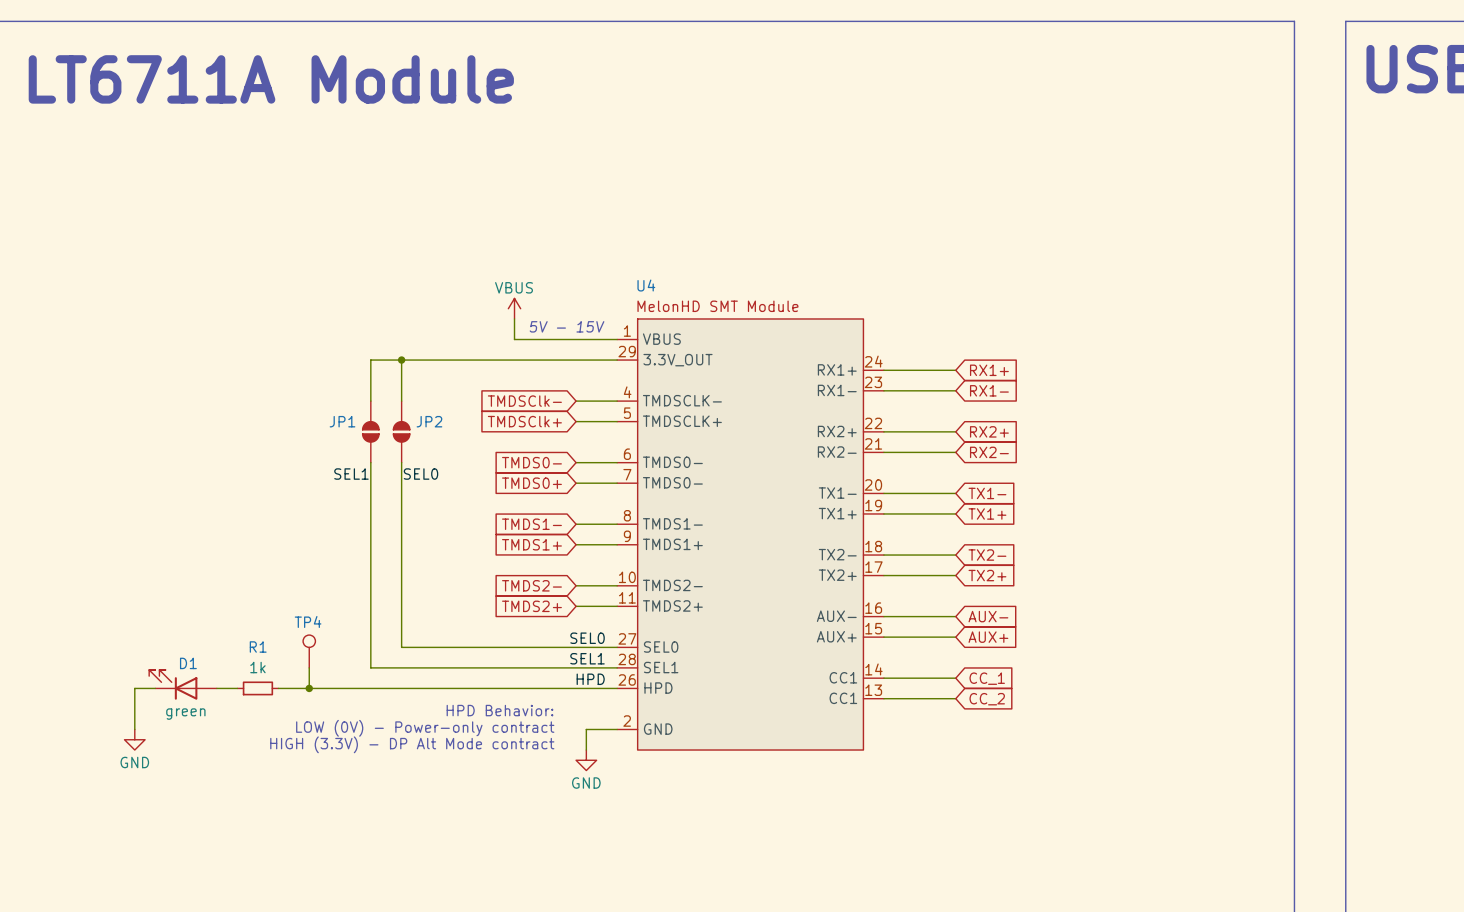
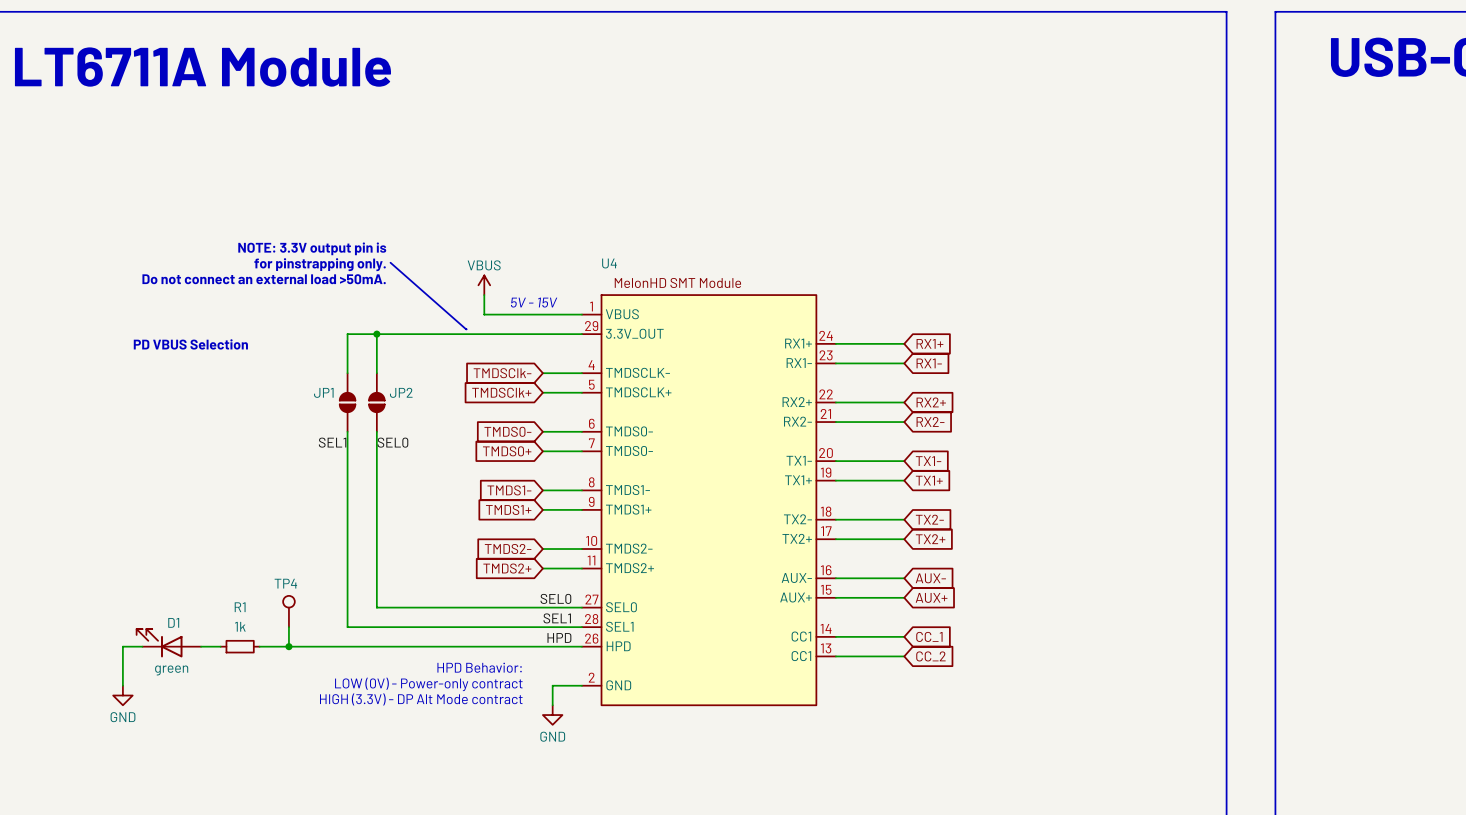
text: none -> NOTE: 3.3V output pin is (312, 248)
line: none -> (390, 262) (466, 329)
text: none -> for pinstrapping only. (320, 264)
text: none -> Do not connect an external load >50mA. (264, 279)
text: none -> PD VBUS Selection (190, 344)

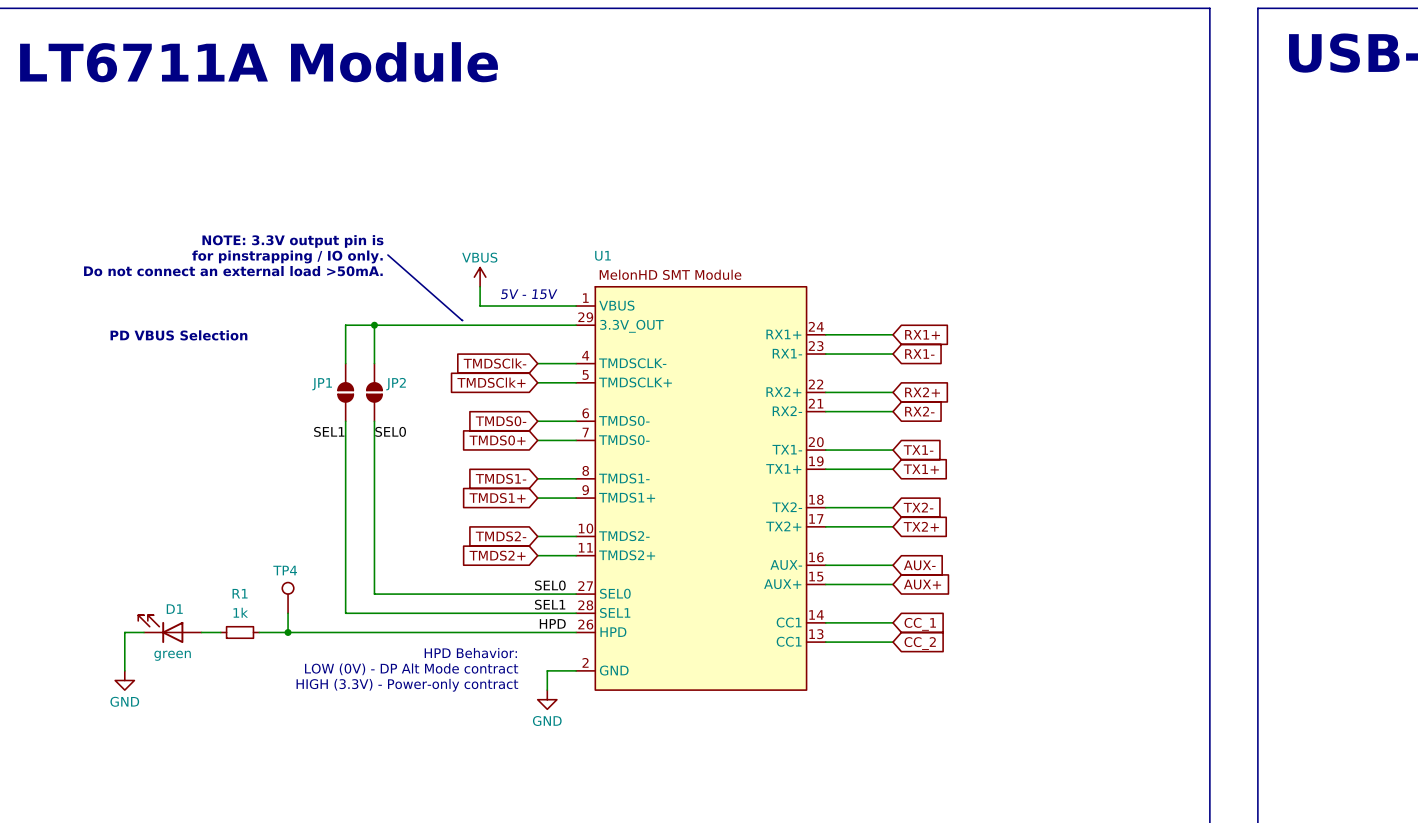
U4 name: U4 (609, 263) -> U1 (602, 255)
text: for pinstrapping only. (320, 264) -> for pinstrapping / IO only. (287, 256)
text: LOW (0V) - Power-only contract (428, 684) -> LOW (0V) - DP Alt Mode contract (411, 669)
text: HIGH (3.3V) - DP Alt Mode contract (421, 699) -> HIGH (3.3V) - Power-only contract (407, 685)

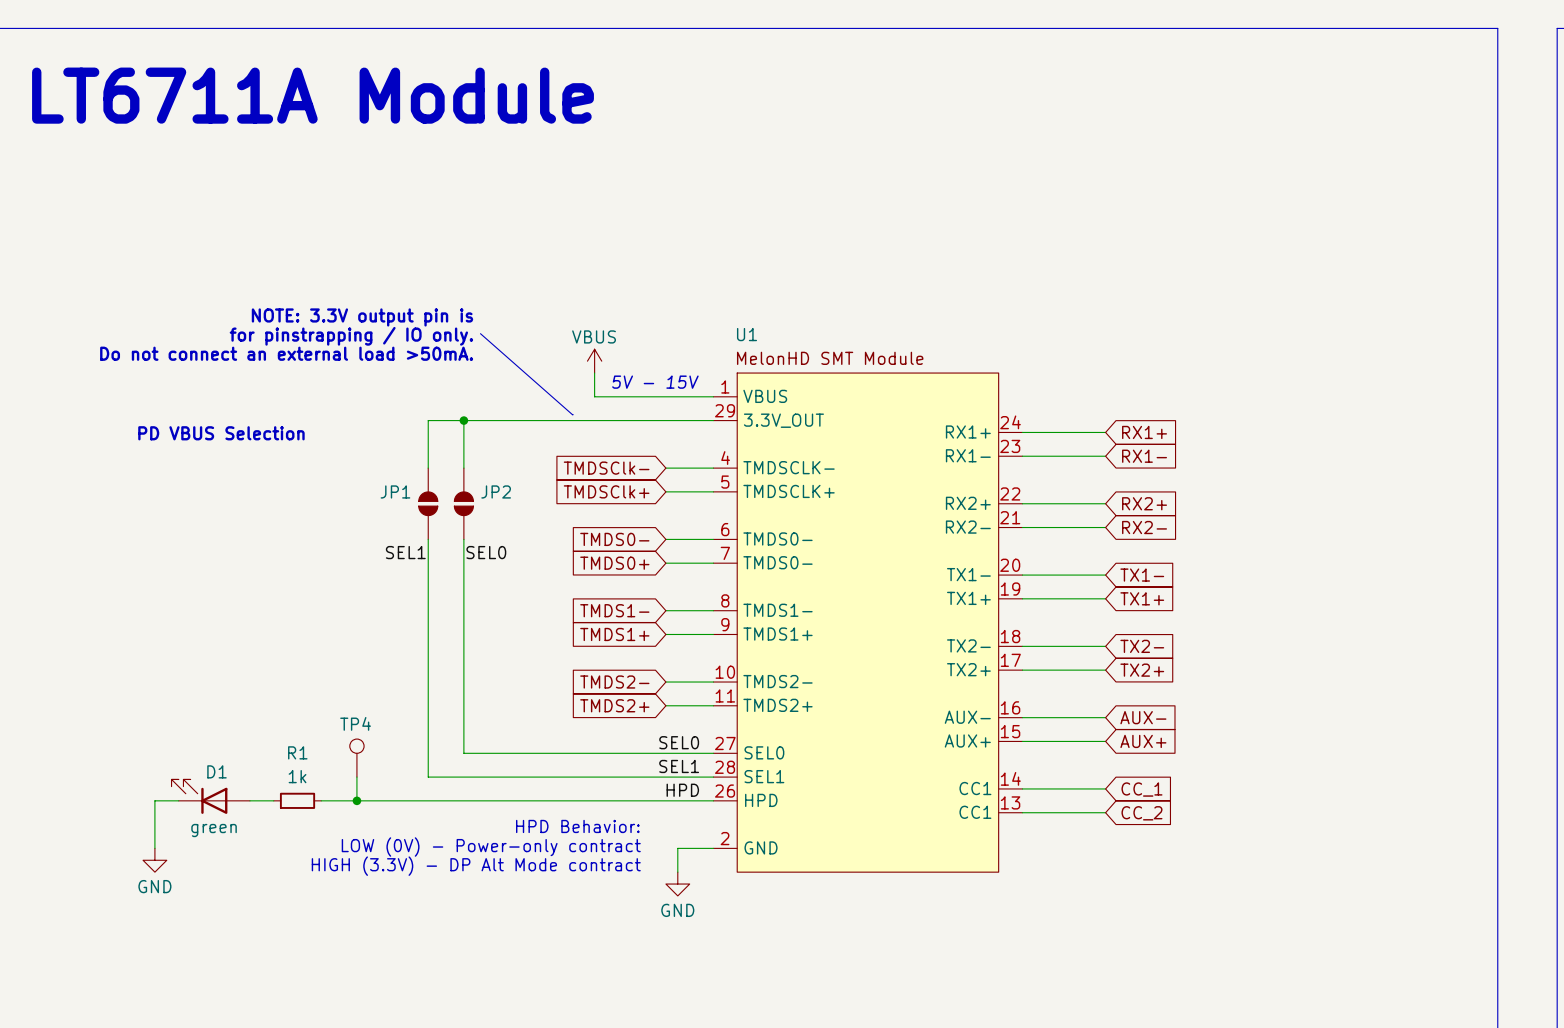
text: LOW (0V) - DP Alt Mode contract (411, 669) -> LOW (0V) - Power-only contract (491, 847)
text: HIGH (3.3V) - Power-only contract (407, 685) -> HIGH (3.3V) - DP Alt Mode contract (476, 866)

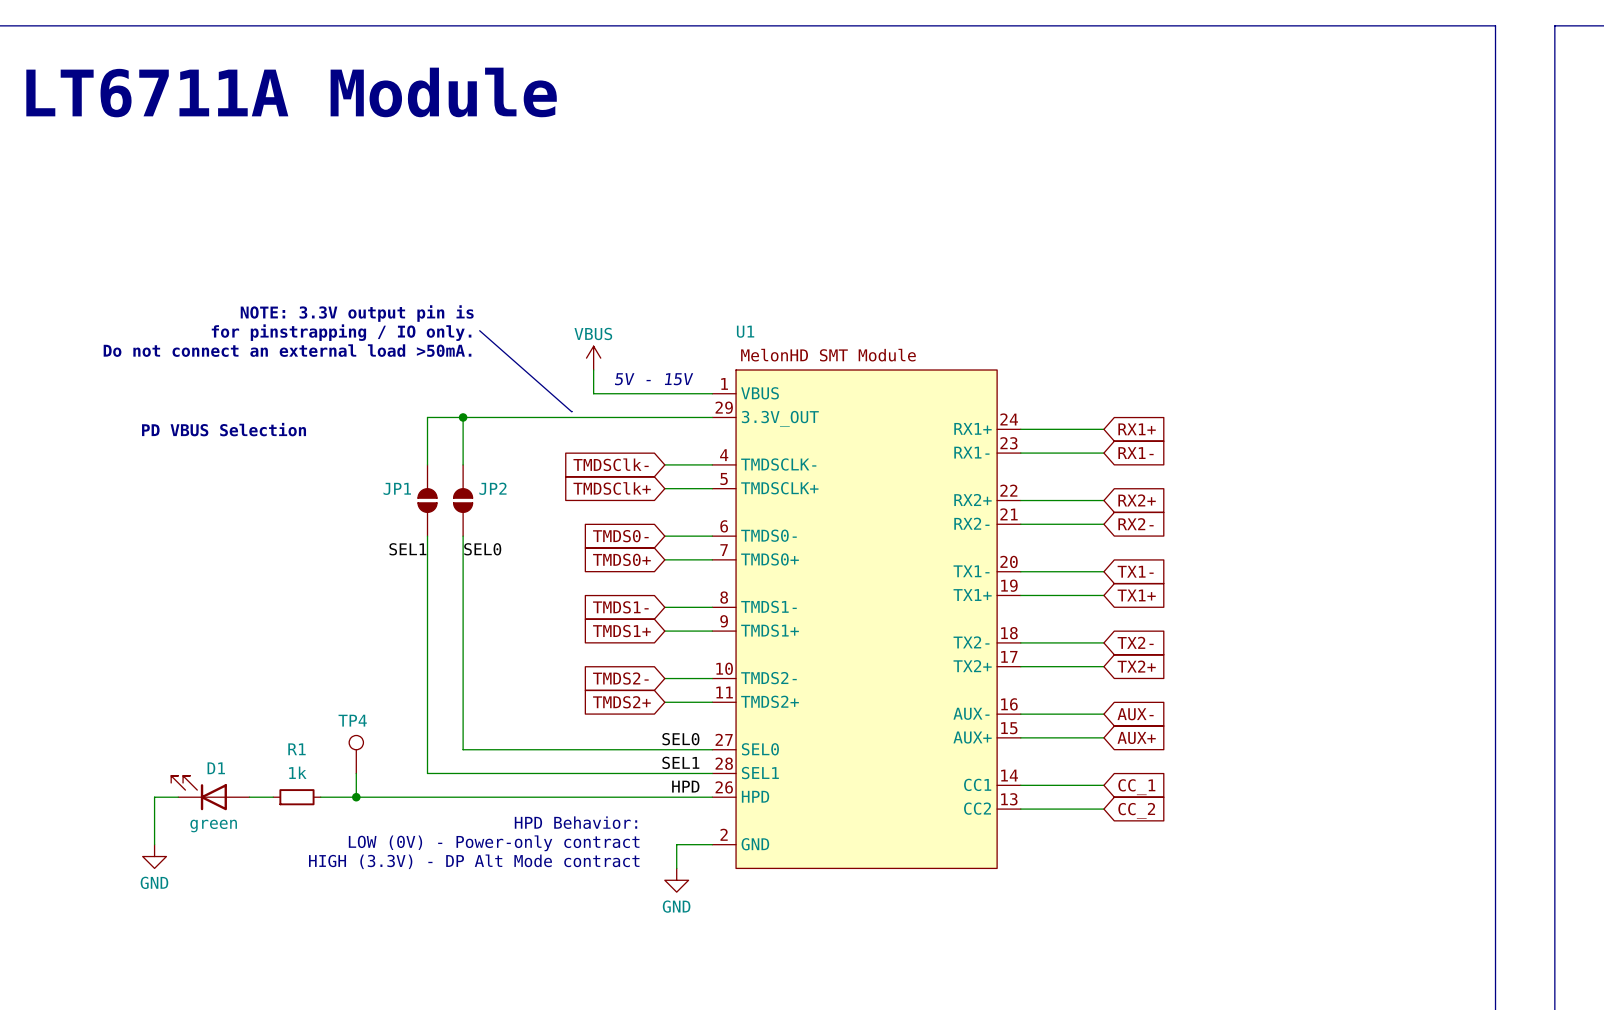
U1 pin name: TMDS0- (777, 562) -> TMDS0+ (770, 559)
U1 pin name: CC1 (975, 812) -> CC2 (977, 808)

